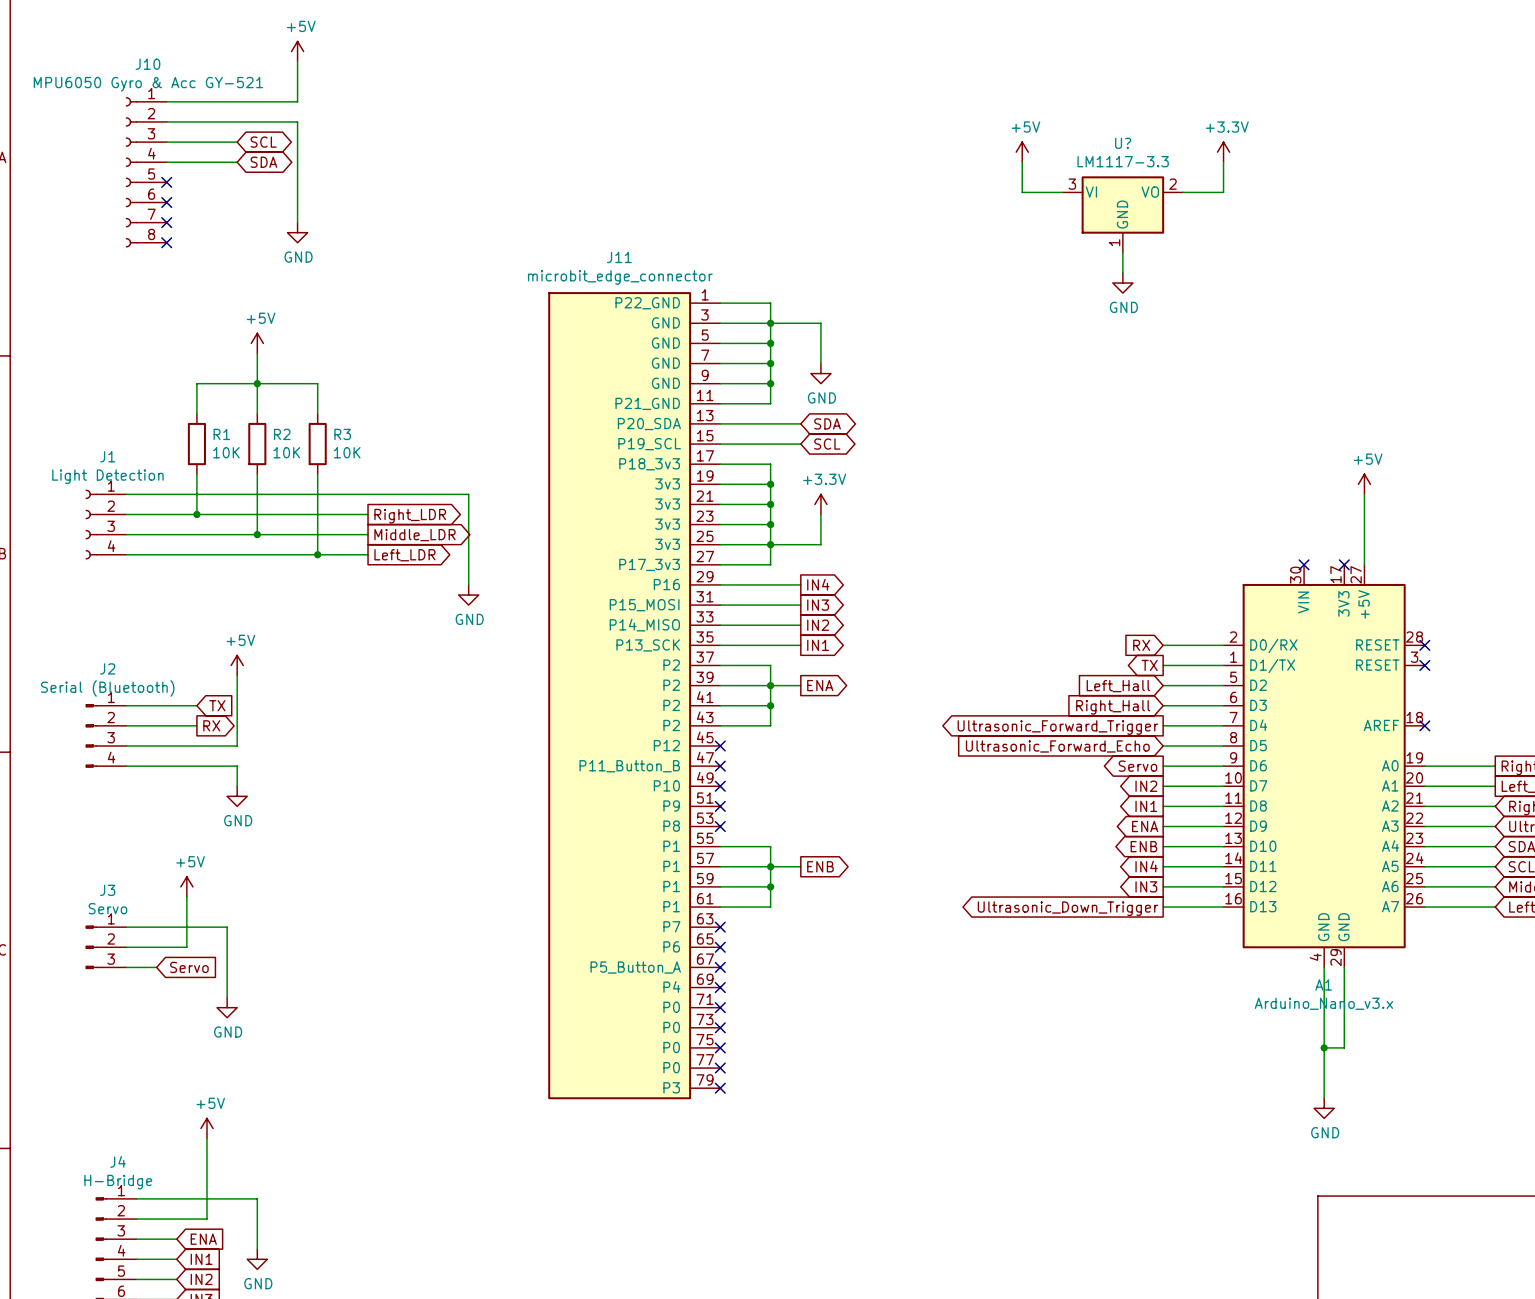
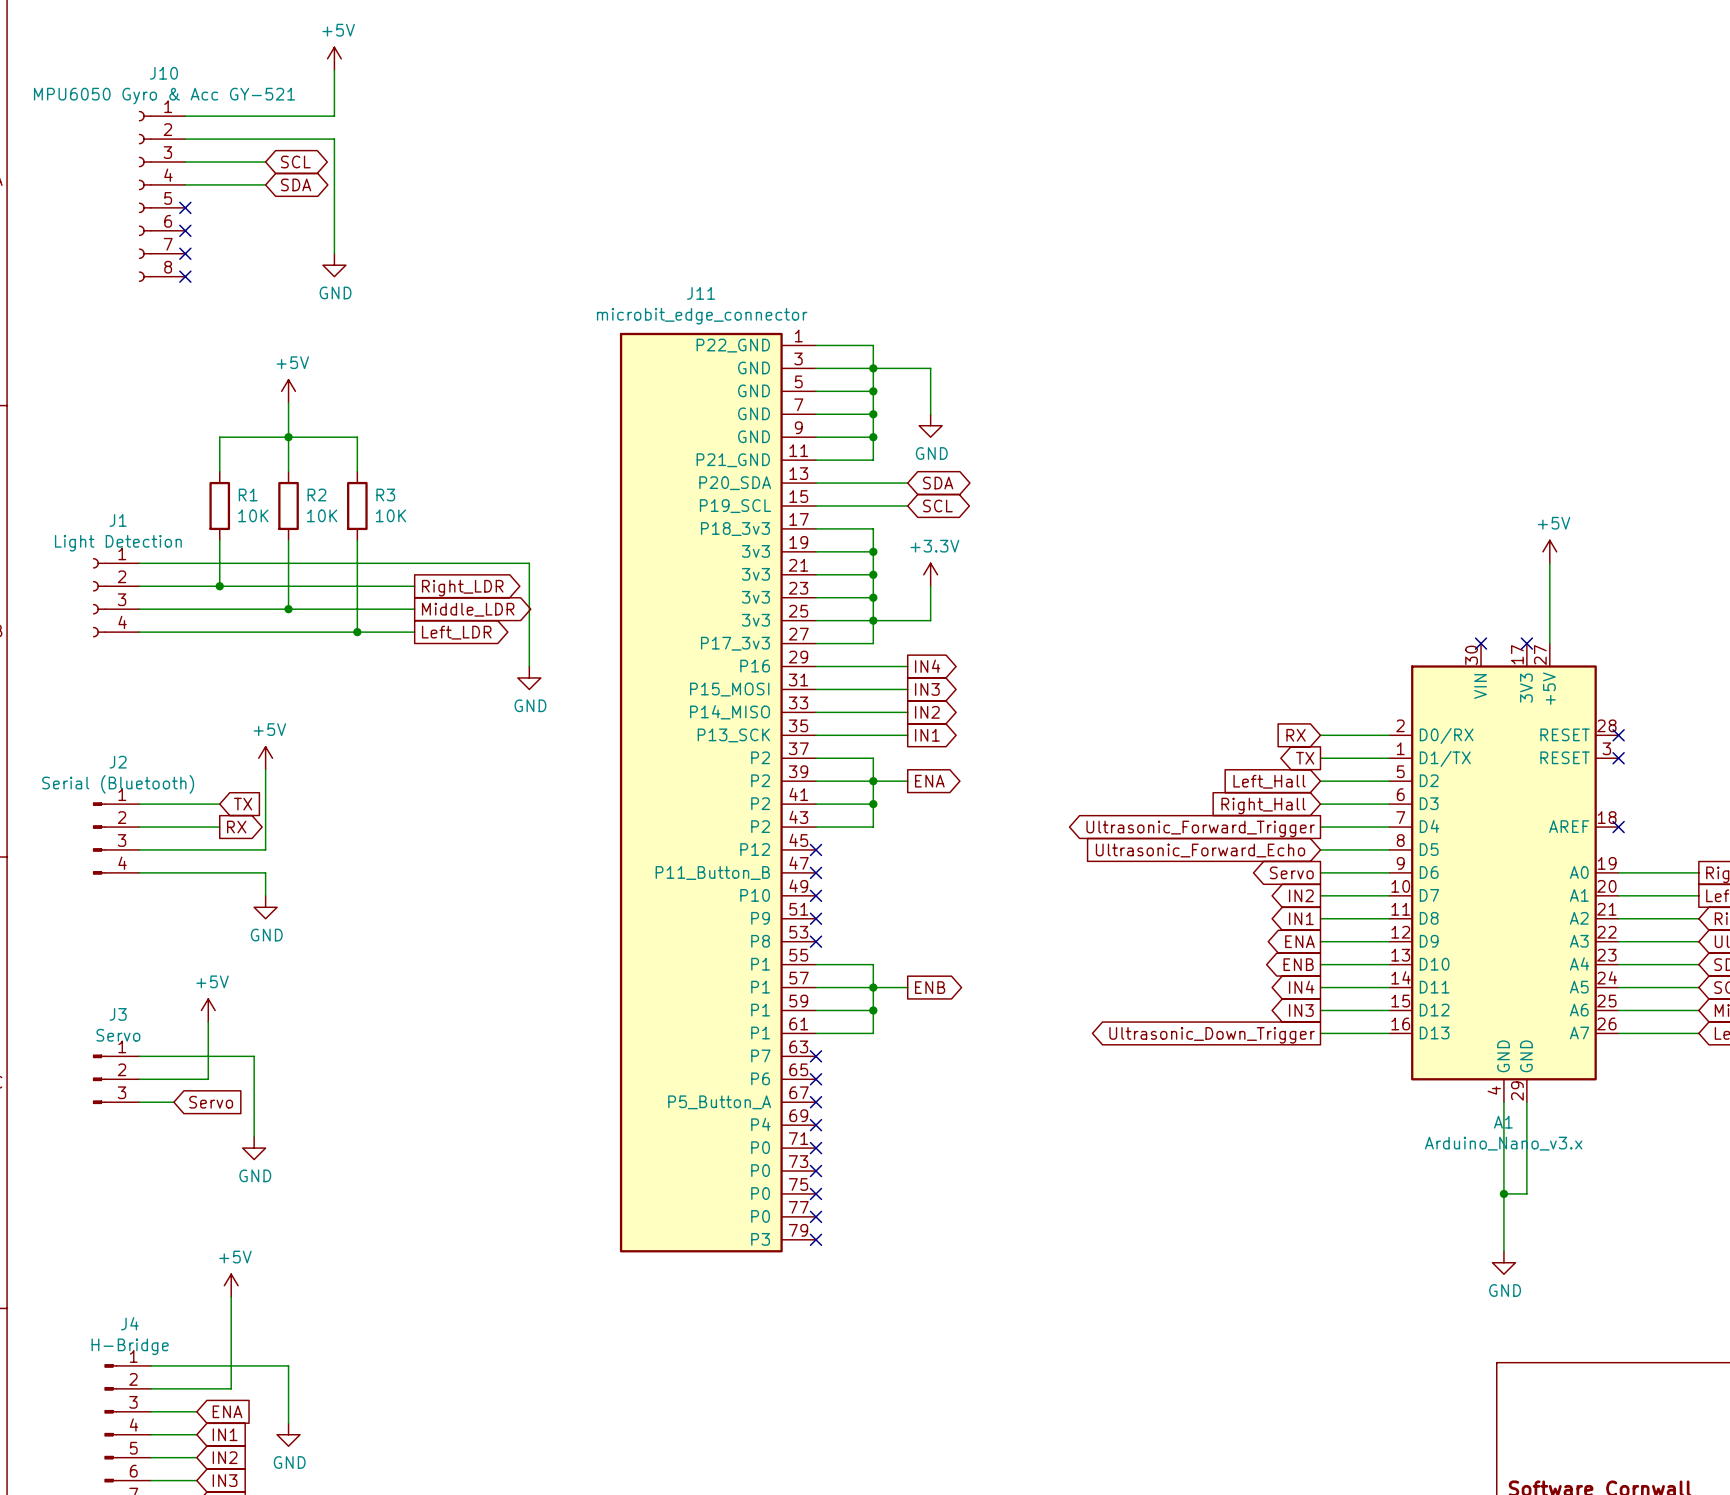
power symbol: +5V (1022, 152) -> none
power symbol: +3.3V (1223, 152) -> none
wire: (1022, 162) (1022, 192) (1062, 192) -> none
wire: (1223, 162) (1223, 192) (1183, 192) -> none
U?: LM1117-3.3 (1122, 214) -> none
wire: (1122, 252) (1122, 272) -> none
power symbol: GND (1122, 283) -> none

